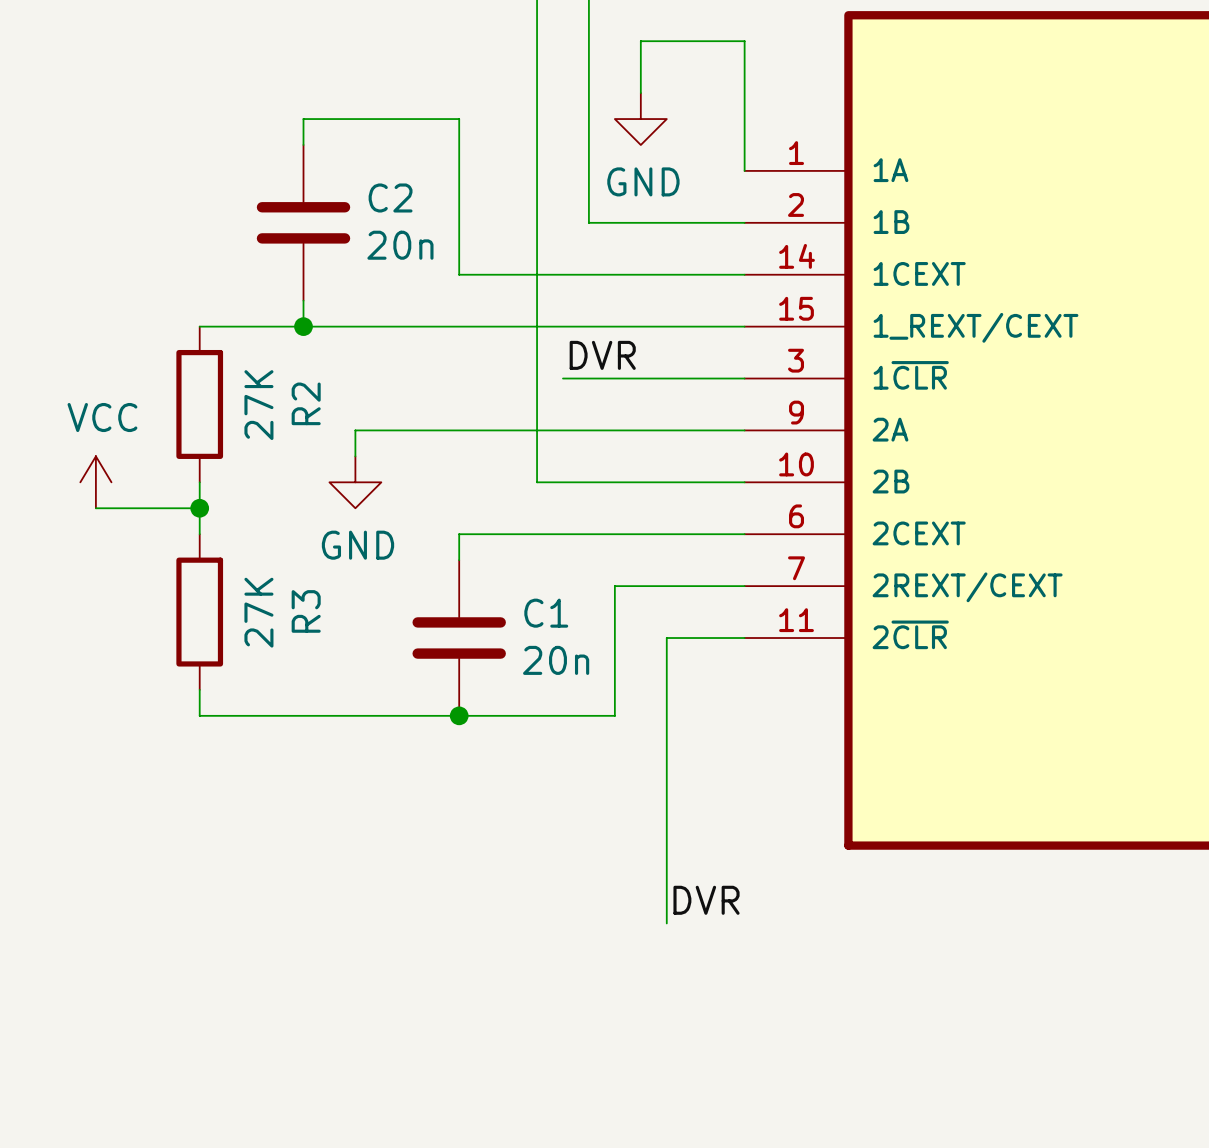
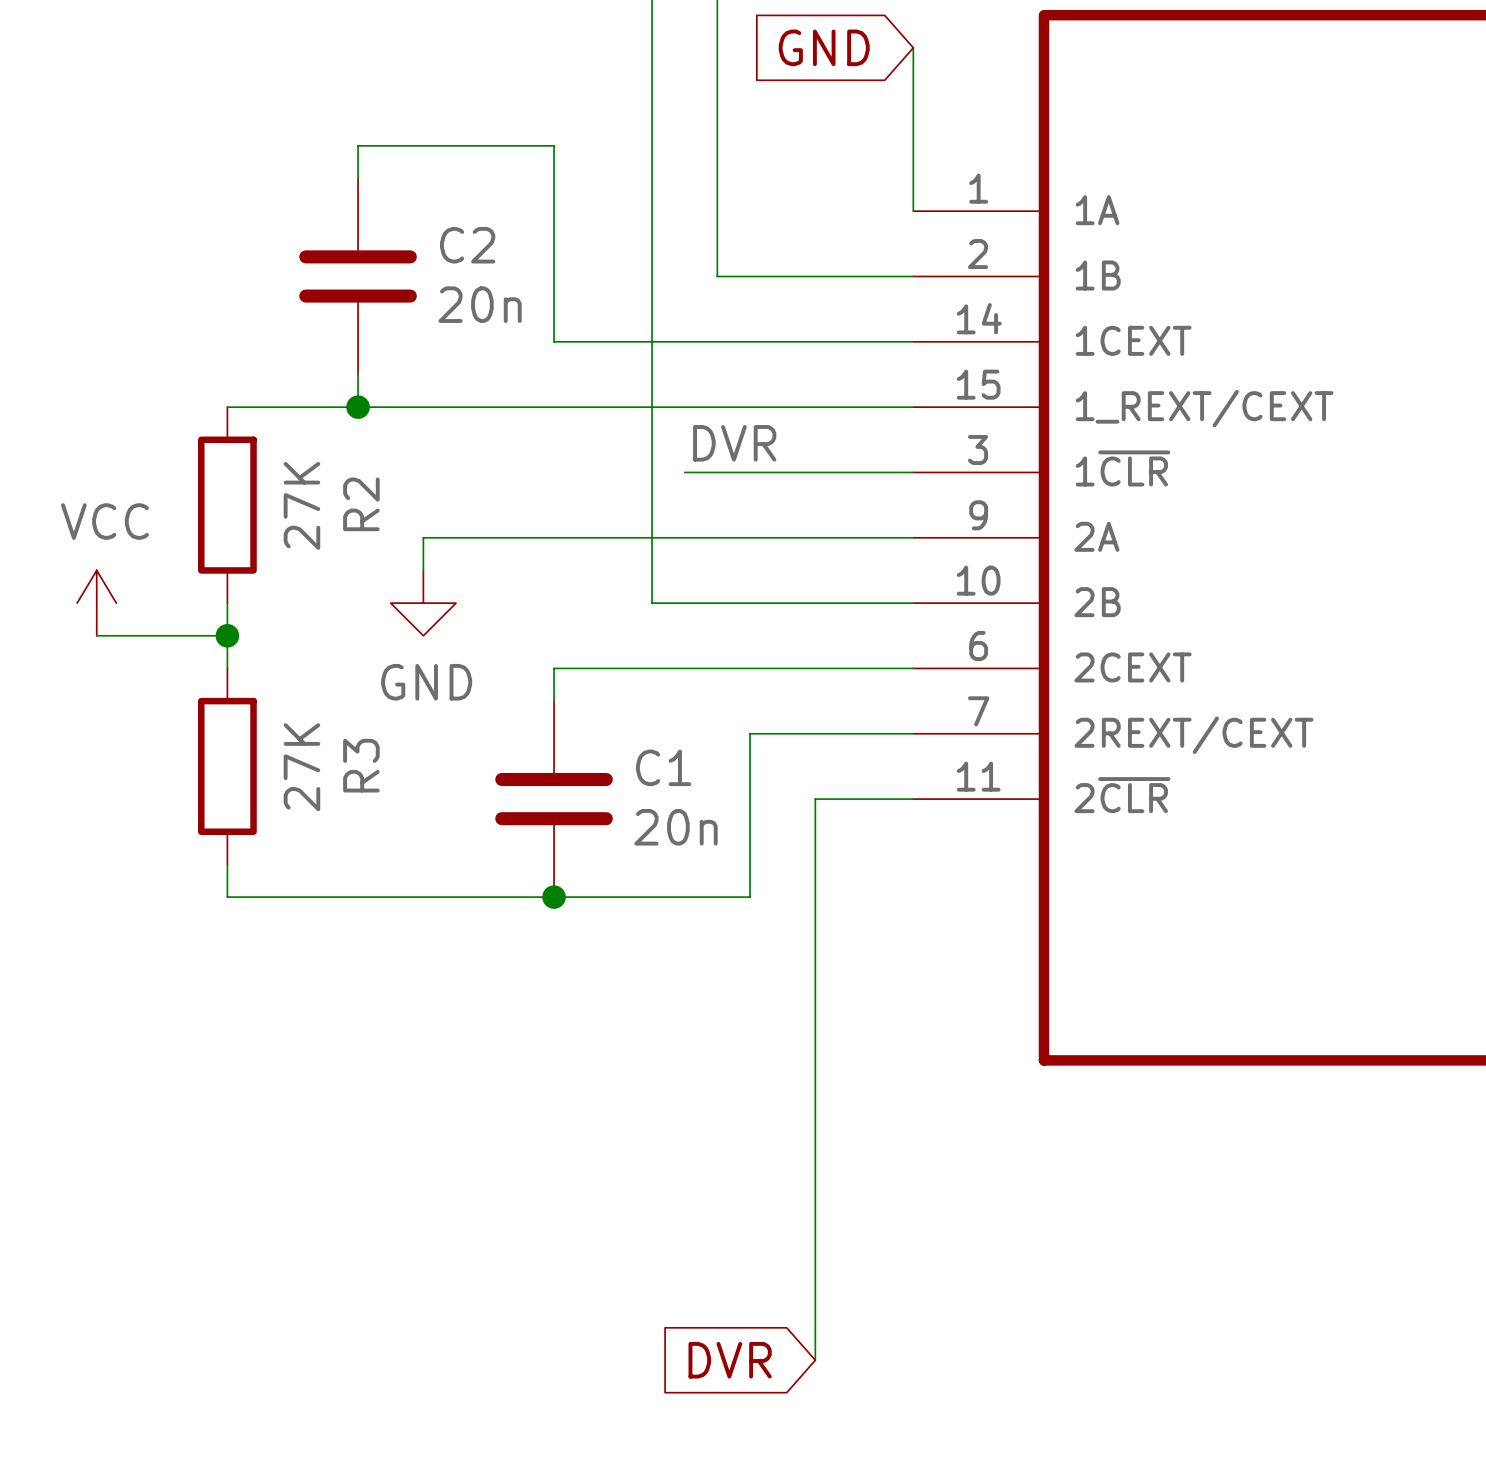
global label: none -> GND (824, 47)
wire: (744, 41) (640, 41) (640, 93) -> none
power symbol: GND (640, 119) -> none
label: DVR (706, 900) -> none
wire: none -> (815, 1158) (815, 1360)
global label: none -> DVR (730, 1360)

